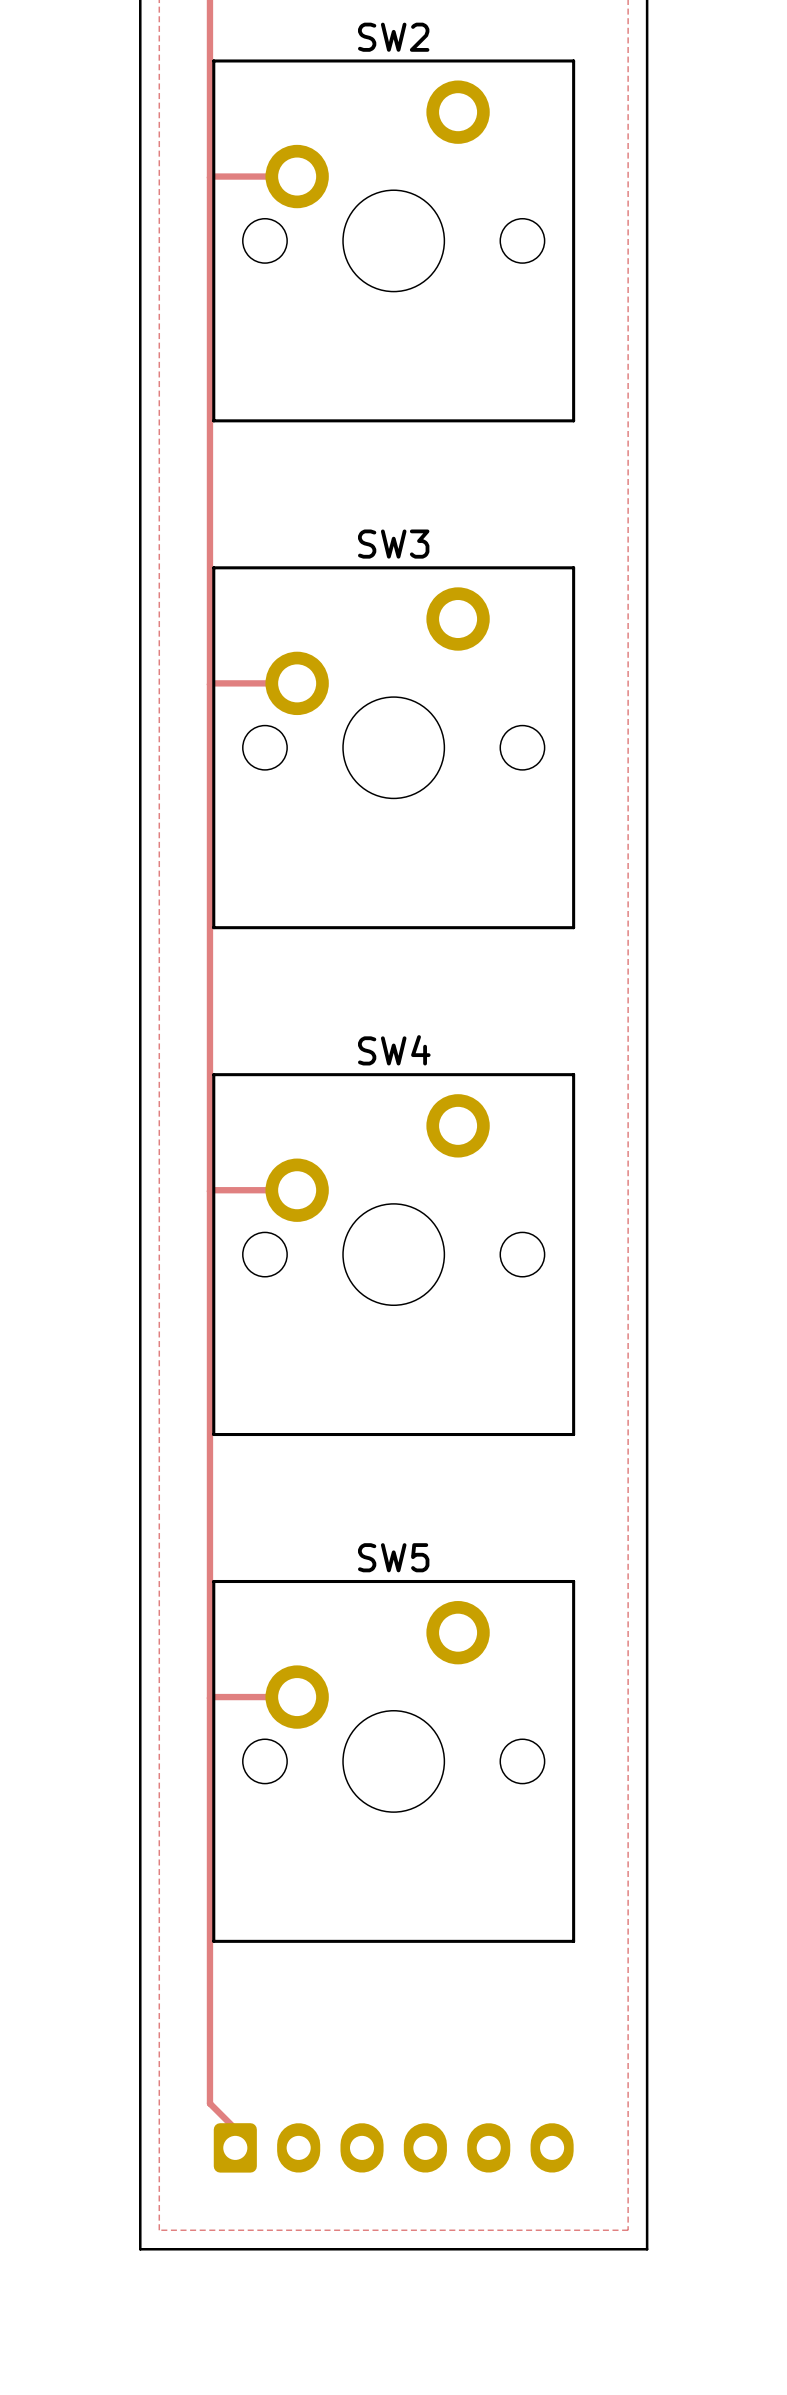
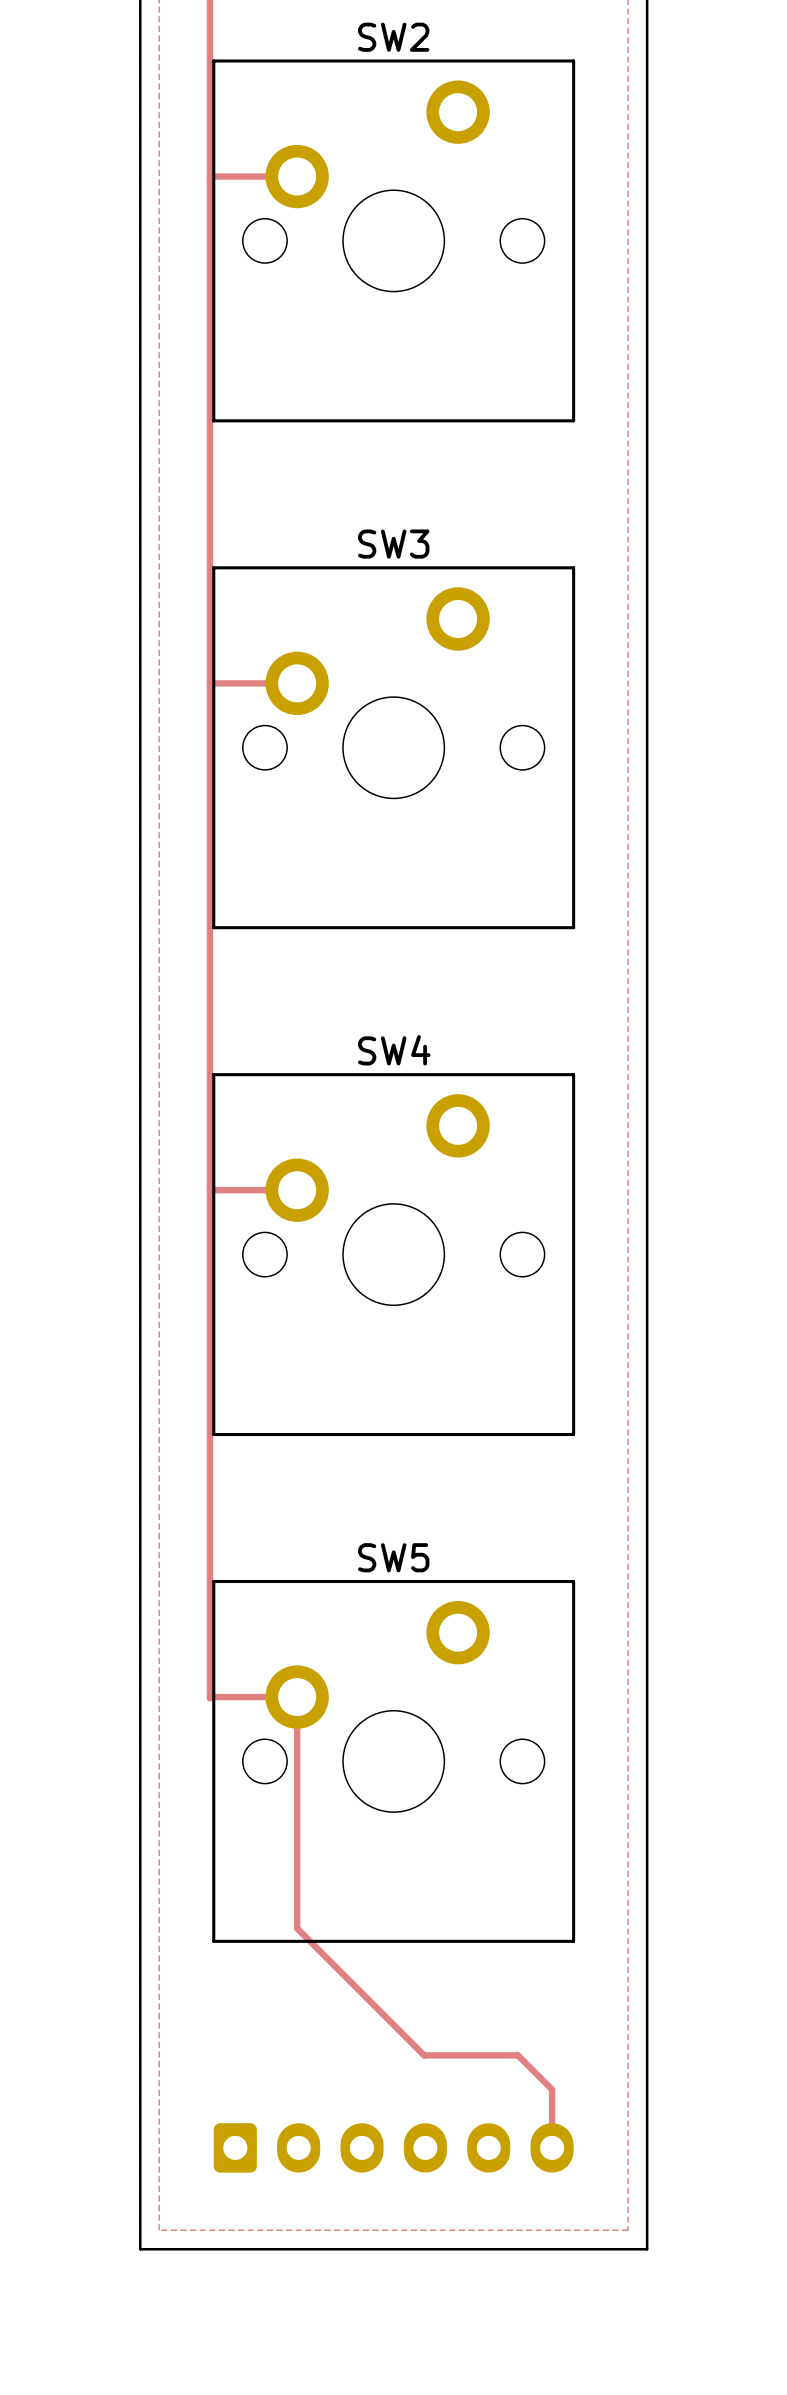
track: none -> (297, 1697) (297, 1928) (424, 2055) (517, 2055) (552, 2089) (552, 2147)
track: (209, 1698) (209, 2103) (235, 2128) (235, 2147) -> none

